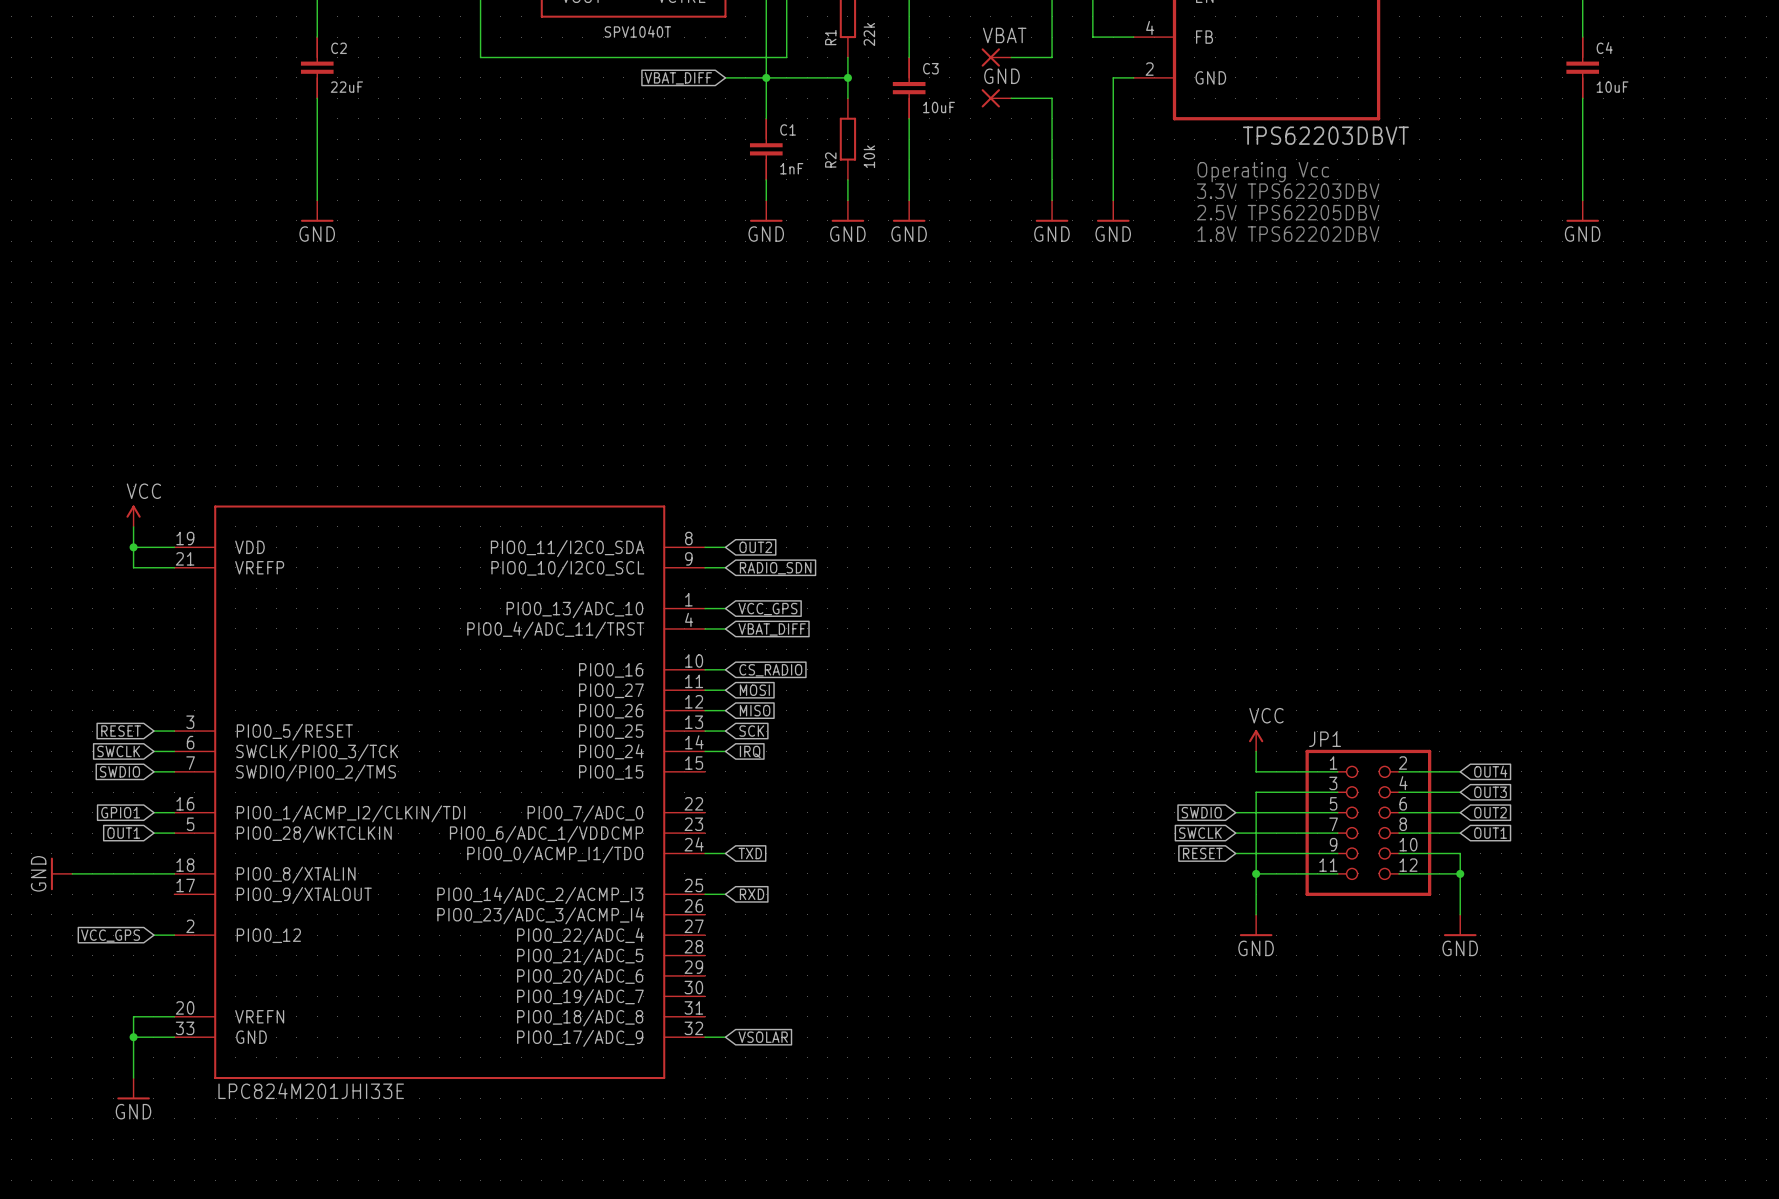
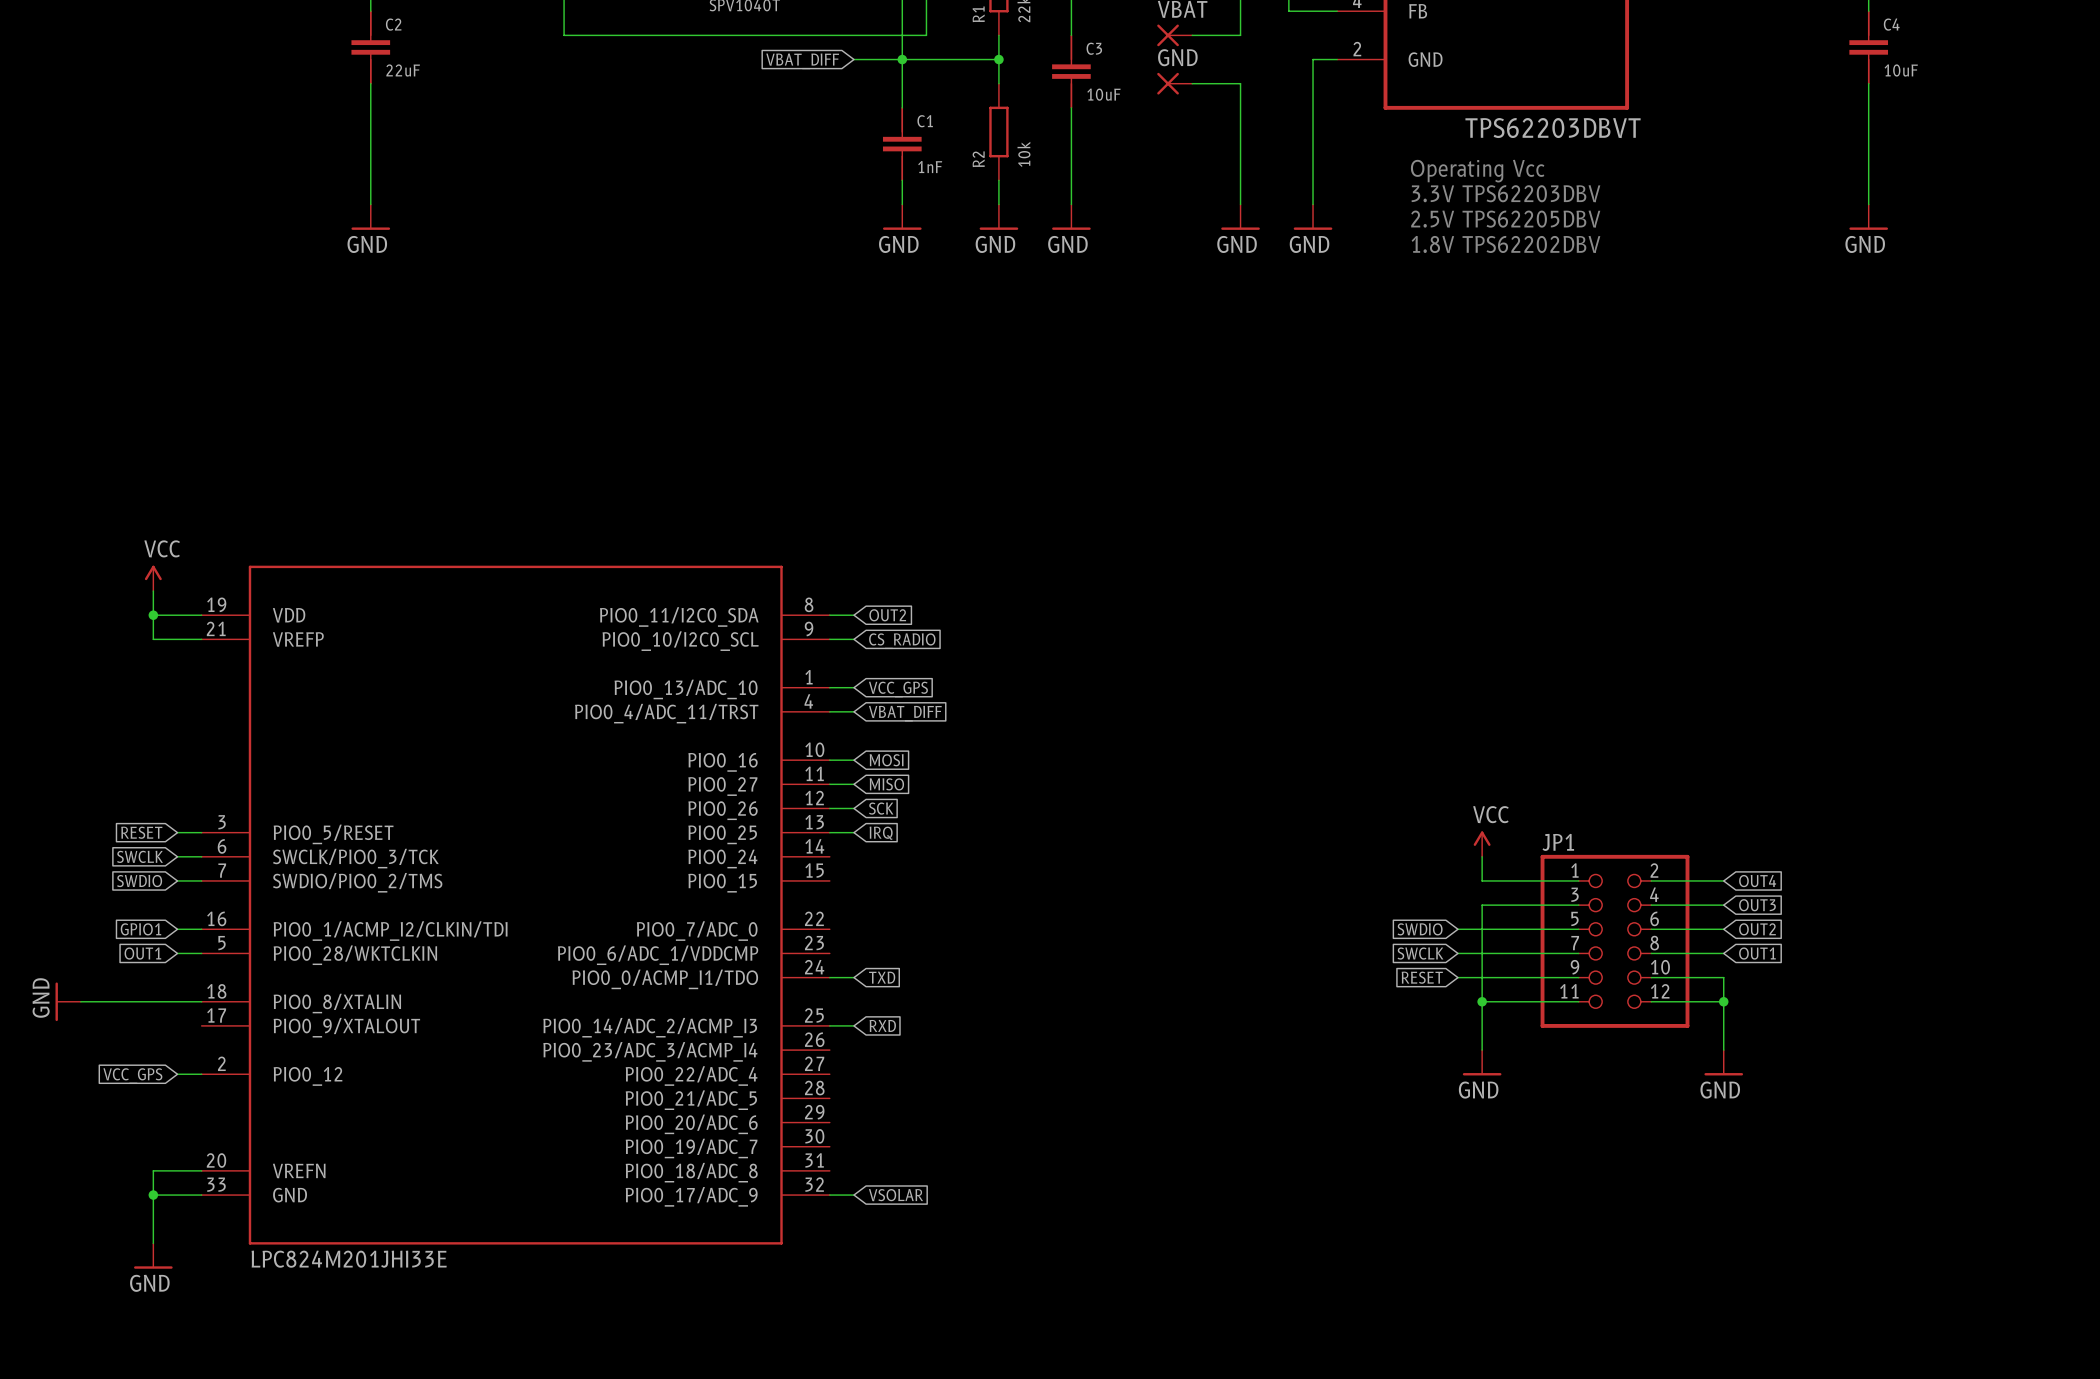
global label: RADIO_SDN (775, 568) -> CS_RADIO (902, 641)
global label: CS_RADIO (770, 670) -> MOSI (886, 760)
global label: MOSI (754, 690) -> MISO (886, 784)
global label: MISO (755, 710) -> SCK (881, 808)
global label: SCK (751, 731) -> IRQ (881, 833)
wire: (705, 751) (725, 751) -> none
global label: IRQ (750, 751) -> none

